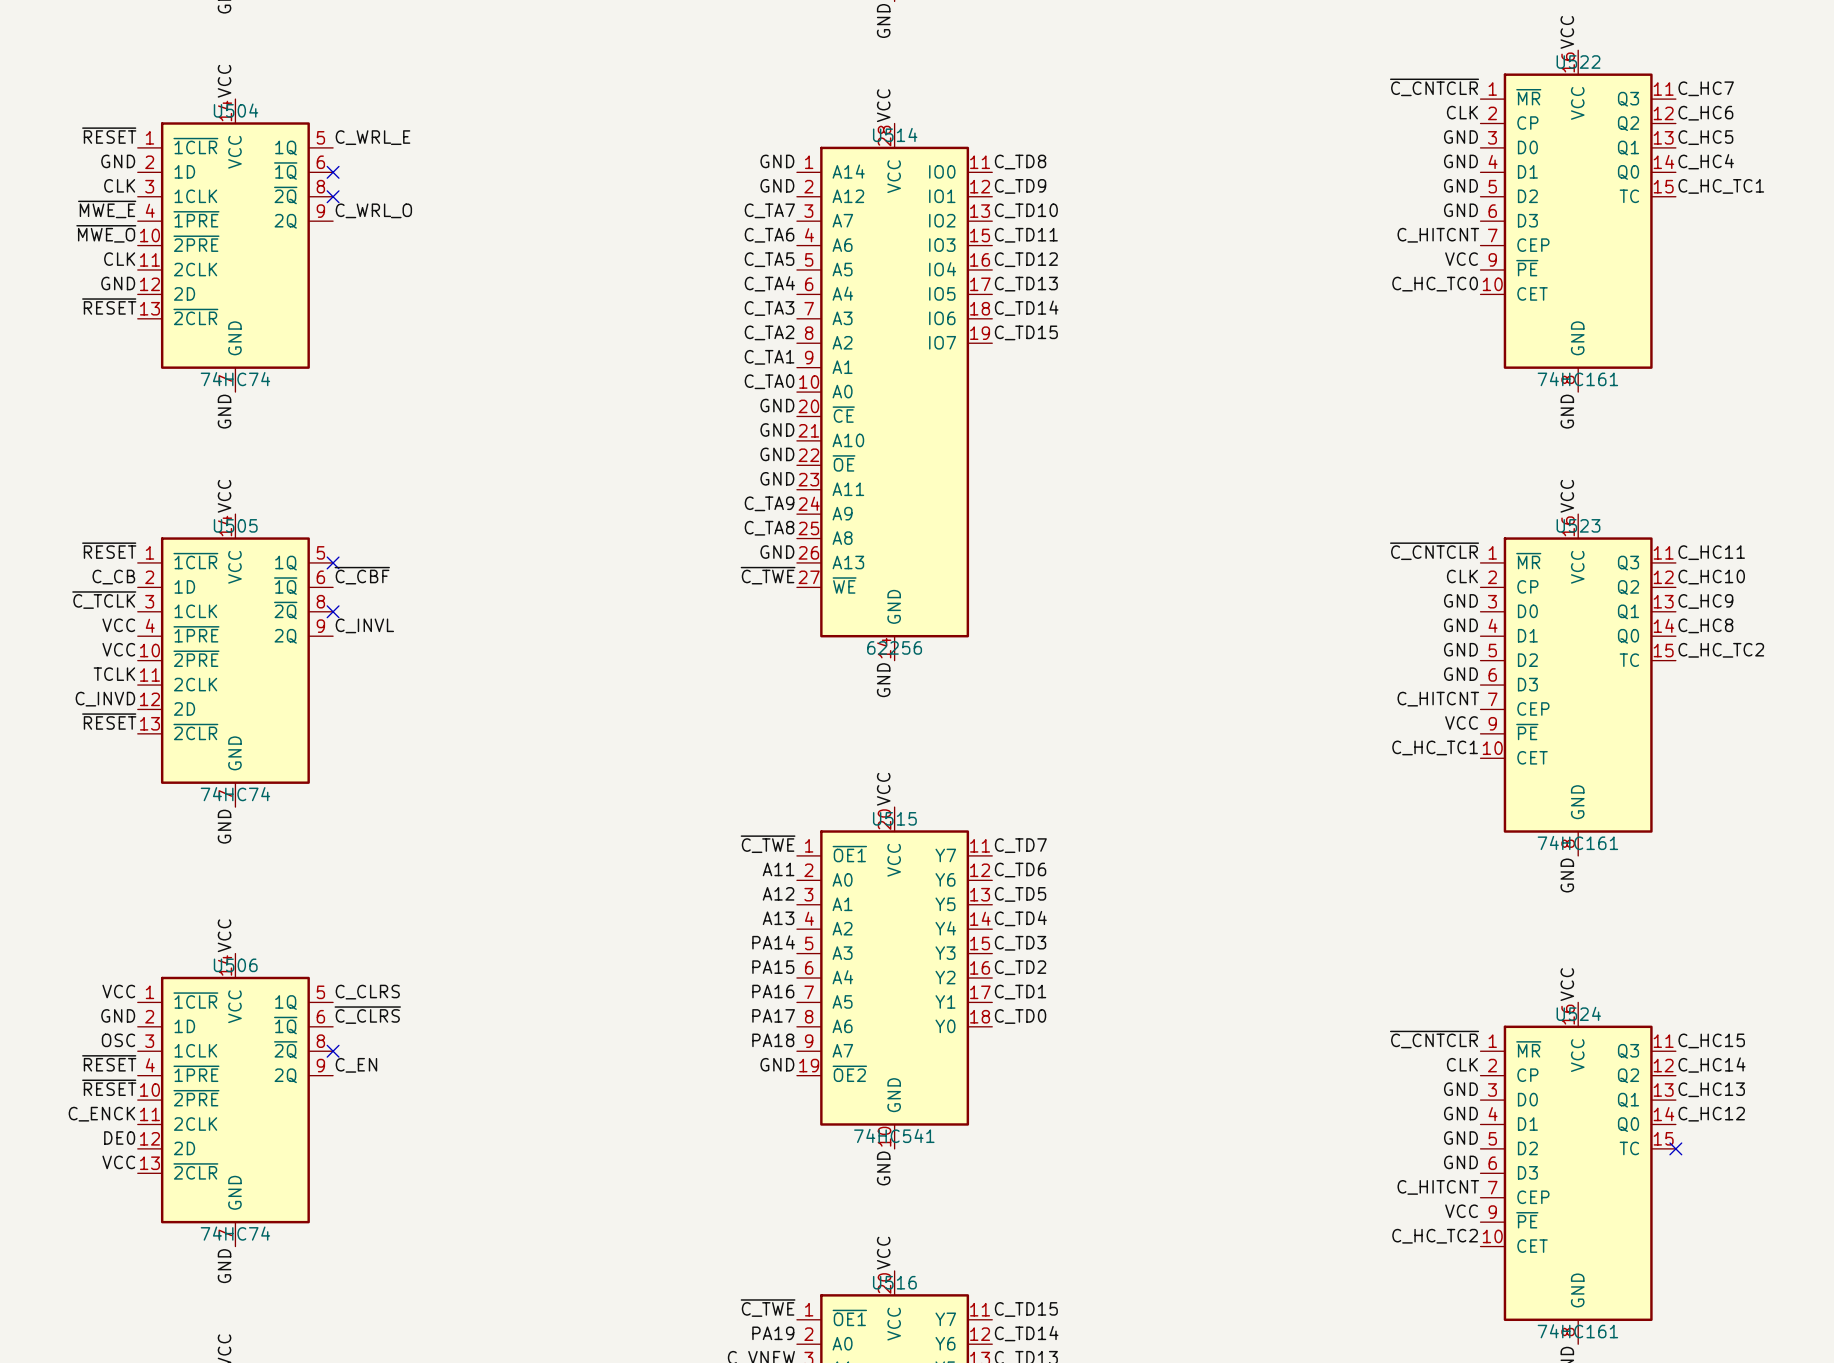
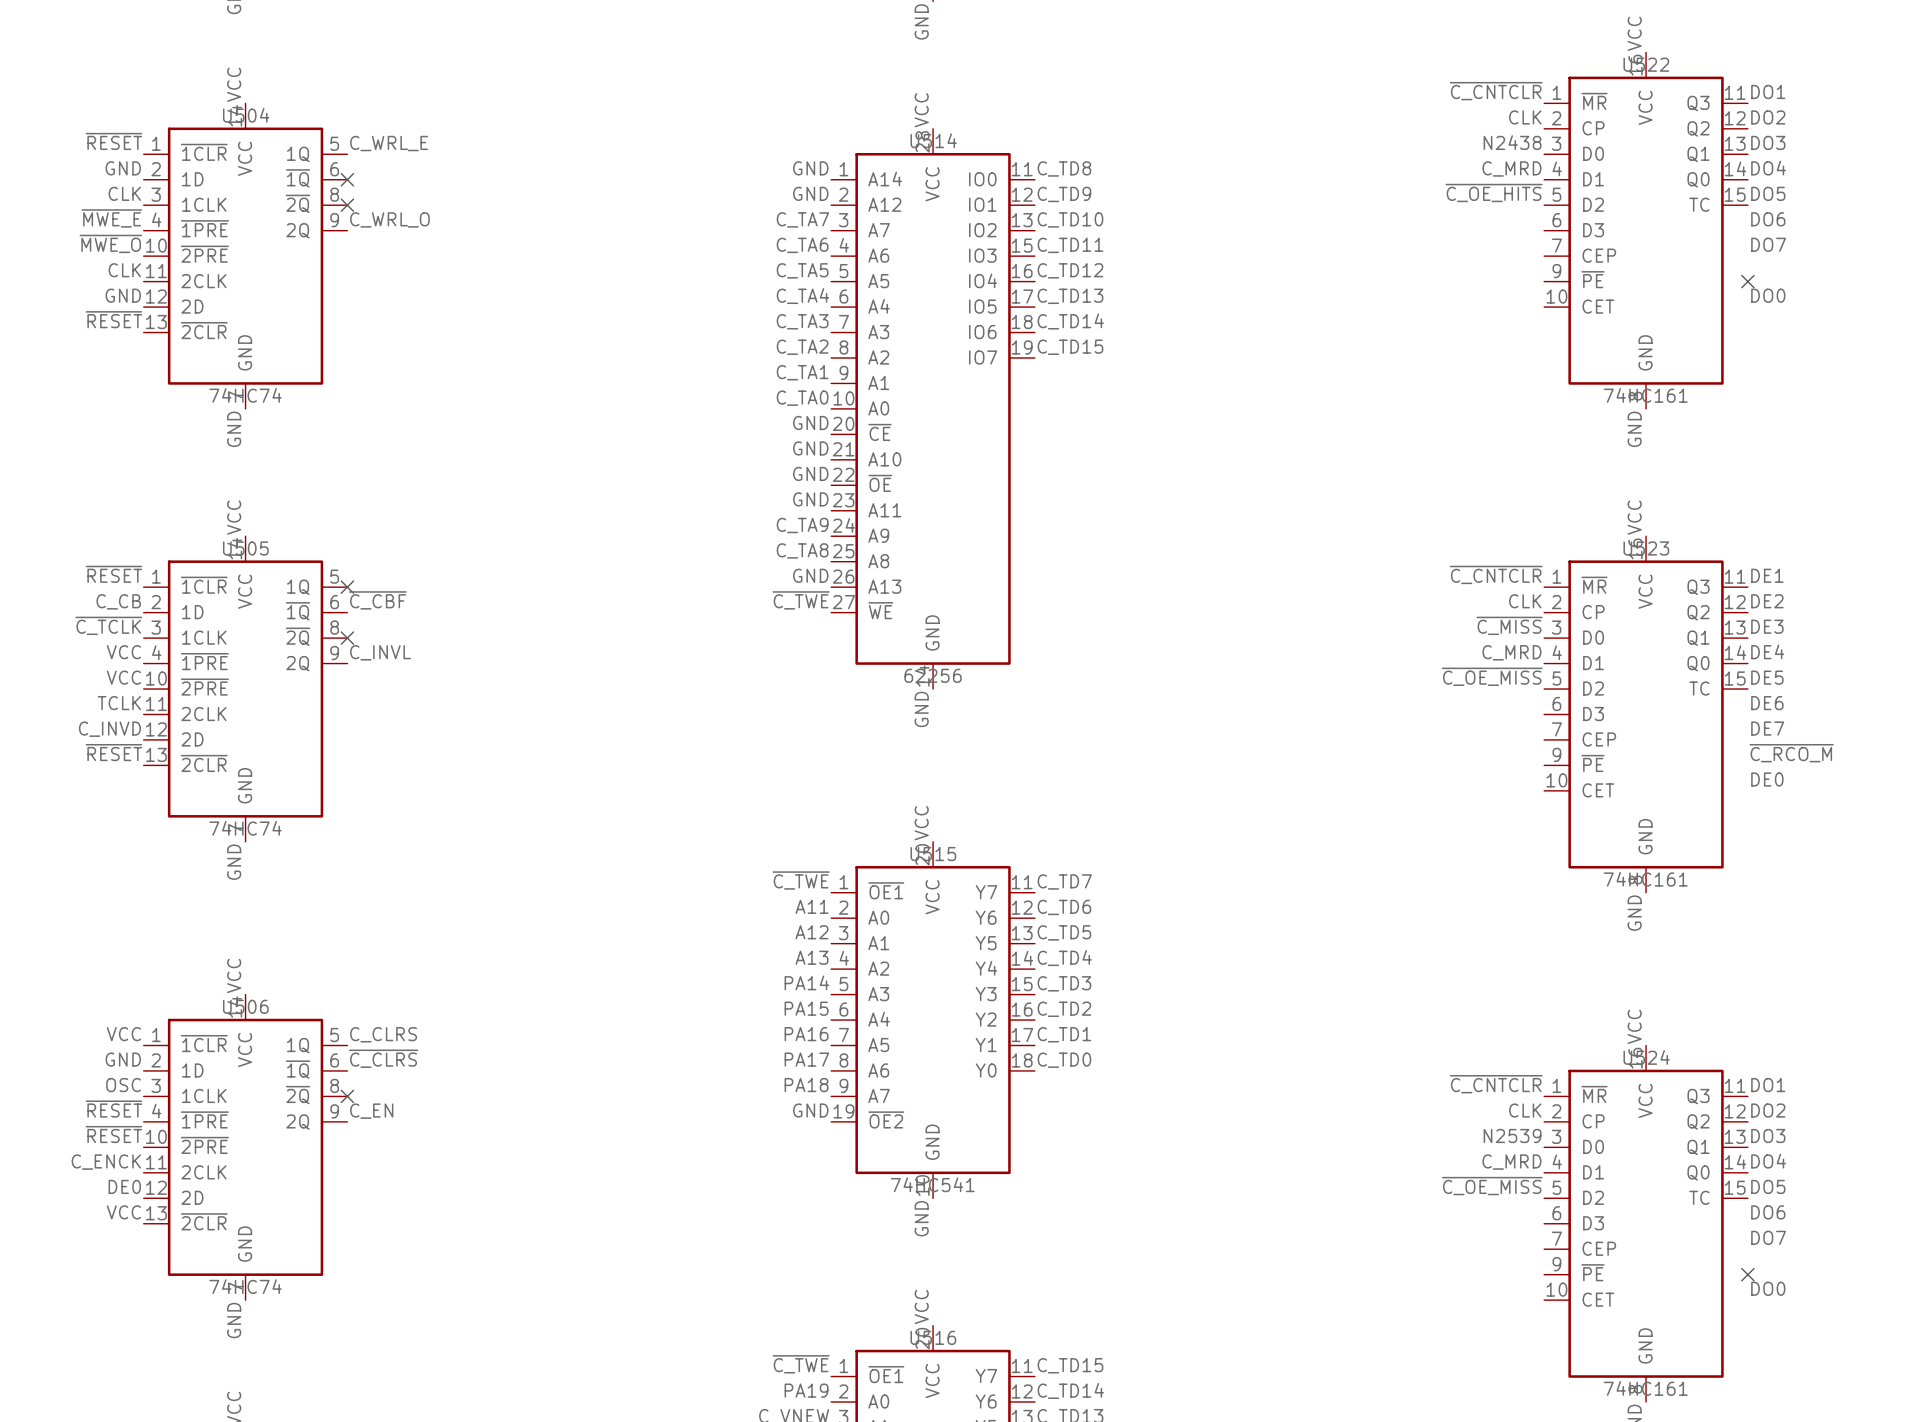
label: C_HC7 (1706, 88) -> DO1 (1768, 91)
label: C_HC6 (1705, 113) -> DO2 (1768, 117)
label: GND (1460, 137) -> N2438 (1512, 142)
label: C_HC5 (1705, 137) -> DO3 (1768, 142)
label: GND (1460, 161) -> C_MRD (1511, 168)
label: C_HC4 (1706, 161) -> DO4 (1768, 168)
label: GND (1460, 185) -> ~{C_OE_HITS} (1494, 192)
label: C_HC_TC1 (1721, 186) -> DO5 (1768, 193)
label: GND (1460, 210) -> none
label: none -> DO6 (1768, 219)
label: none -> DO7 (1768, 244)
label: C_HITCNT (1438, 235) -> none
label: VCC (1461, 259) -> none
no-connect mark: none -> (1747, 281)
label: none -> DO0 (1768, 295)
label: C_HC_TC0 (1435, 284) -> none
label: C_HC11 (1711, 552) -> DE1 (1767, 575)
label: C_HC10 (1711, 577) -> DE2 (1767, 601)
label: GND (1460, 600) -> ~{C_MISS} (1509, 625)
label: C_HC9 (1705, 601) -> DE3 (1767, 626)
label: GND (1460, 625) -> C_MRD (1511, 652)
label: C_HC8 (1705, 625) -> DE4 (1767, 651)
label: GND (1460, 649) -> ~{C_OE_MISS} (1492, 676)
label: C_HC_TC2 (1721, 650) -> DE5 (1767, 677)
label: GND (1460, 674) -> none
label: none -> DE6 (1767, 703)
label: none -> DE7 (1767, 728)
label: C_HITCNT (1438, 699) -> none
label: VCC (1461, 722) -> none
label: none -> ~{C_RCO_M} (1791, 753)
label: C_HC_TC1 (1435, 747) -> none
label: none -> DE0 (1767, 779)
label: C_HC15 (1711, 1040) -> DO1 (1768, 1085)
label: C_HC14 (1711, 1065) -> DO2 (1768, 1110)
label: GND (1460, 1089) -> N2539 (1512, 1135)
label: C_HC13 (1711, 1089) -> DO3 (1768, 1135)
label: GND (1460, 1113) -> C_MRD (1511, 1162)
label: C_HC12 (1711, 1114) -> DO4 (1768, 1161)
label: GND (1460, 1138) -> ~{C_OE_MISS} (1492, 1186)
label: none -> DO5 (1768, 1186)
no-connect mark: (1675, 1148) -> none
label: GND (1460, 1162) -> none
label: none -> DO6 (1768, 1212)
label: none -> DO7 (1768, 1237)
label: C_HITCNT (1438, 1187) -> none
label: VCC (1461, 1211) -> none
no-connect mark: none -> (1747, 1274)
label: none -> DO0 (1768, 1288)
label: C_HC_TC2 (1435, 1236) -> none

